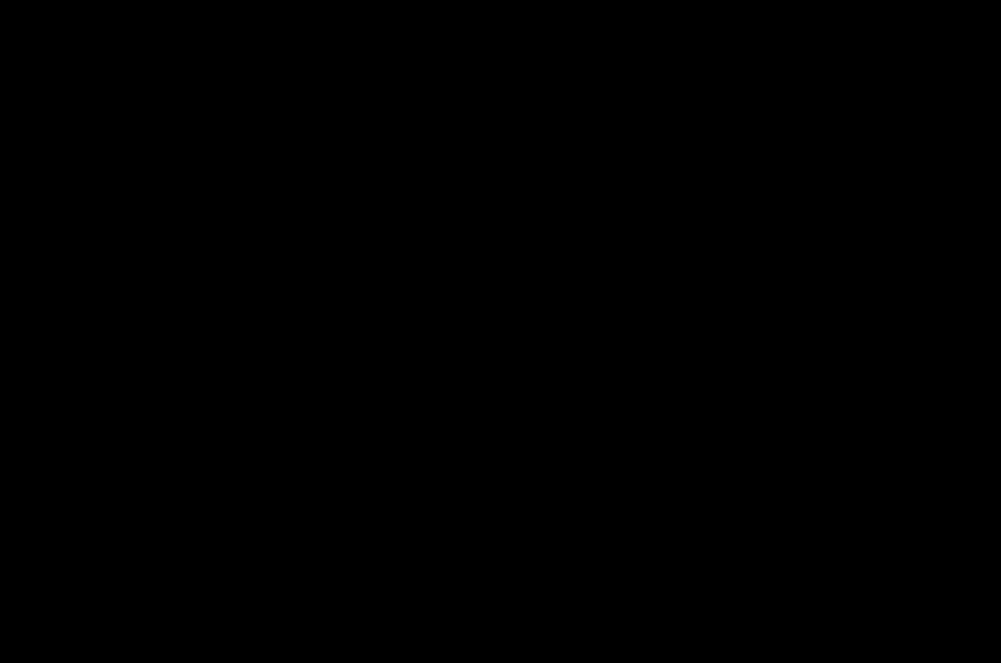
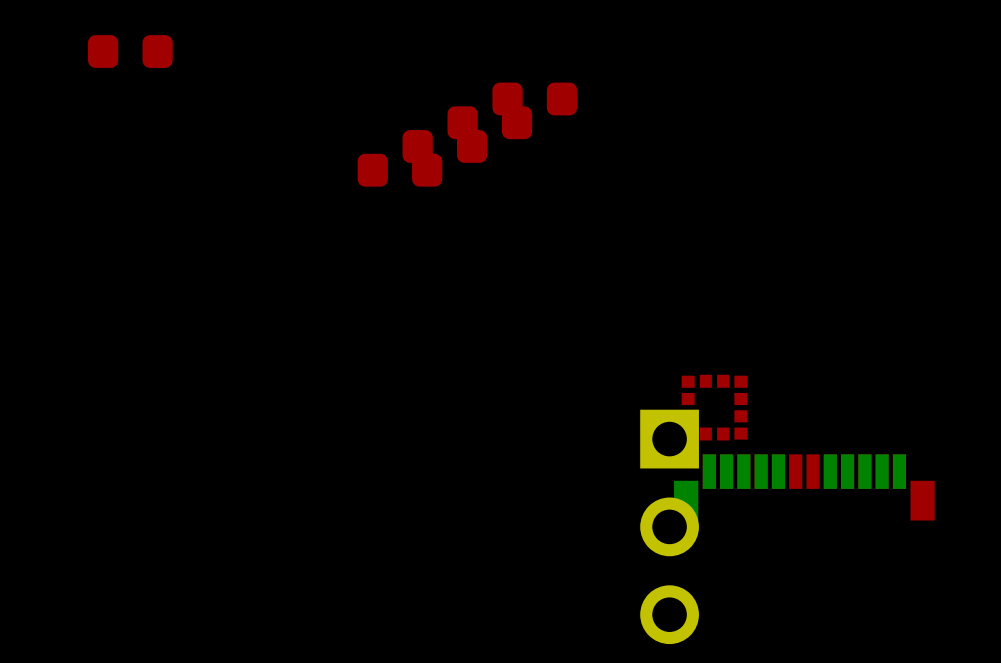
part: none -> (130, 51)
part: none -> (534, 98)
part: none -> (489, 122)
part: none -> (444, 146)
part: none -> (399, 170)
part: none -> (714, 407)
part: none -> (804, 487)
part: none -> (669, 526)

